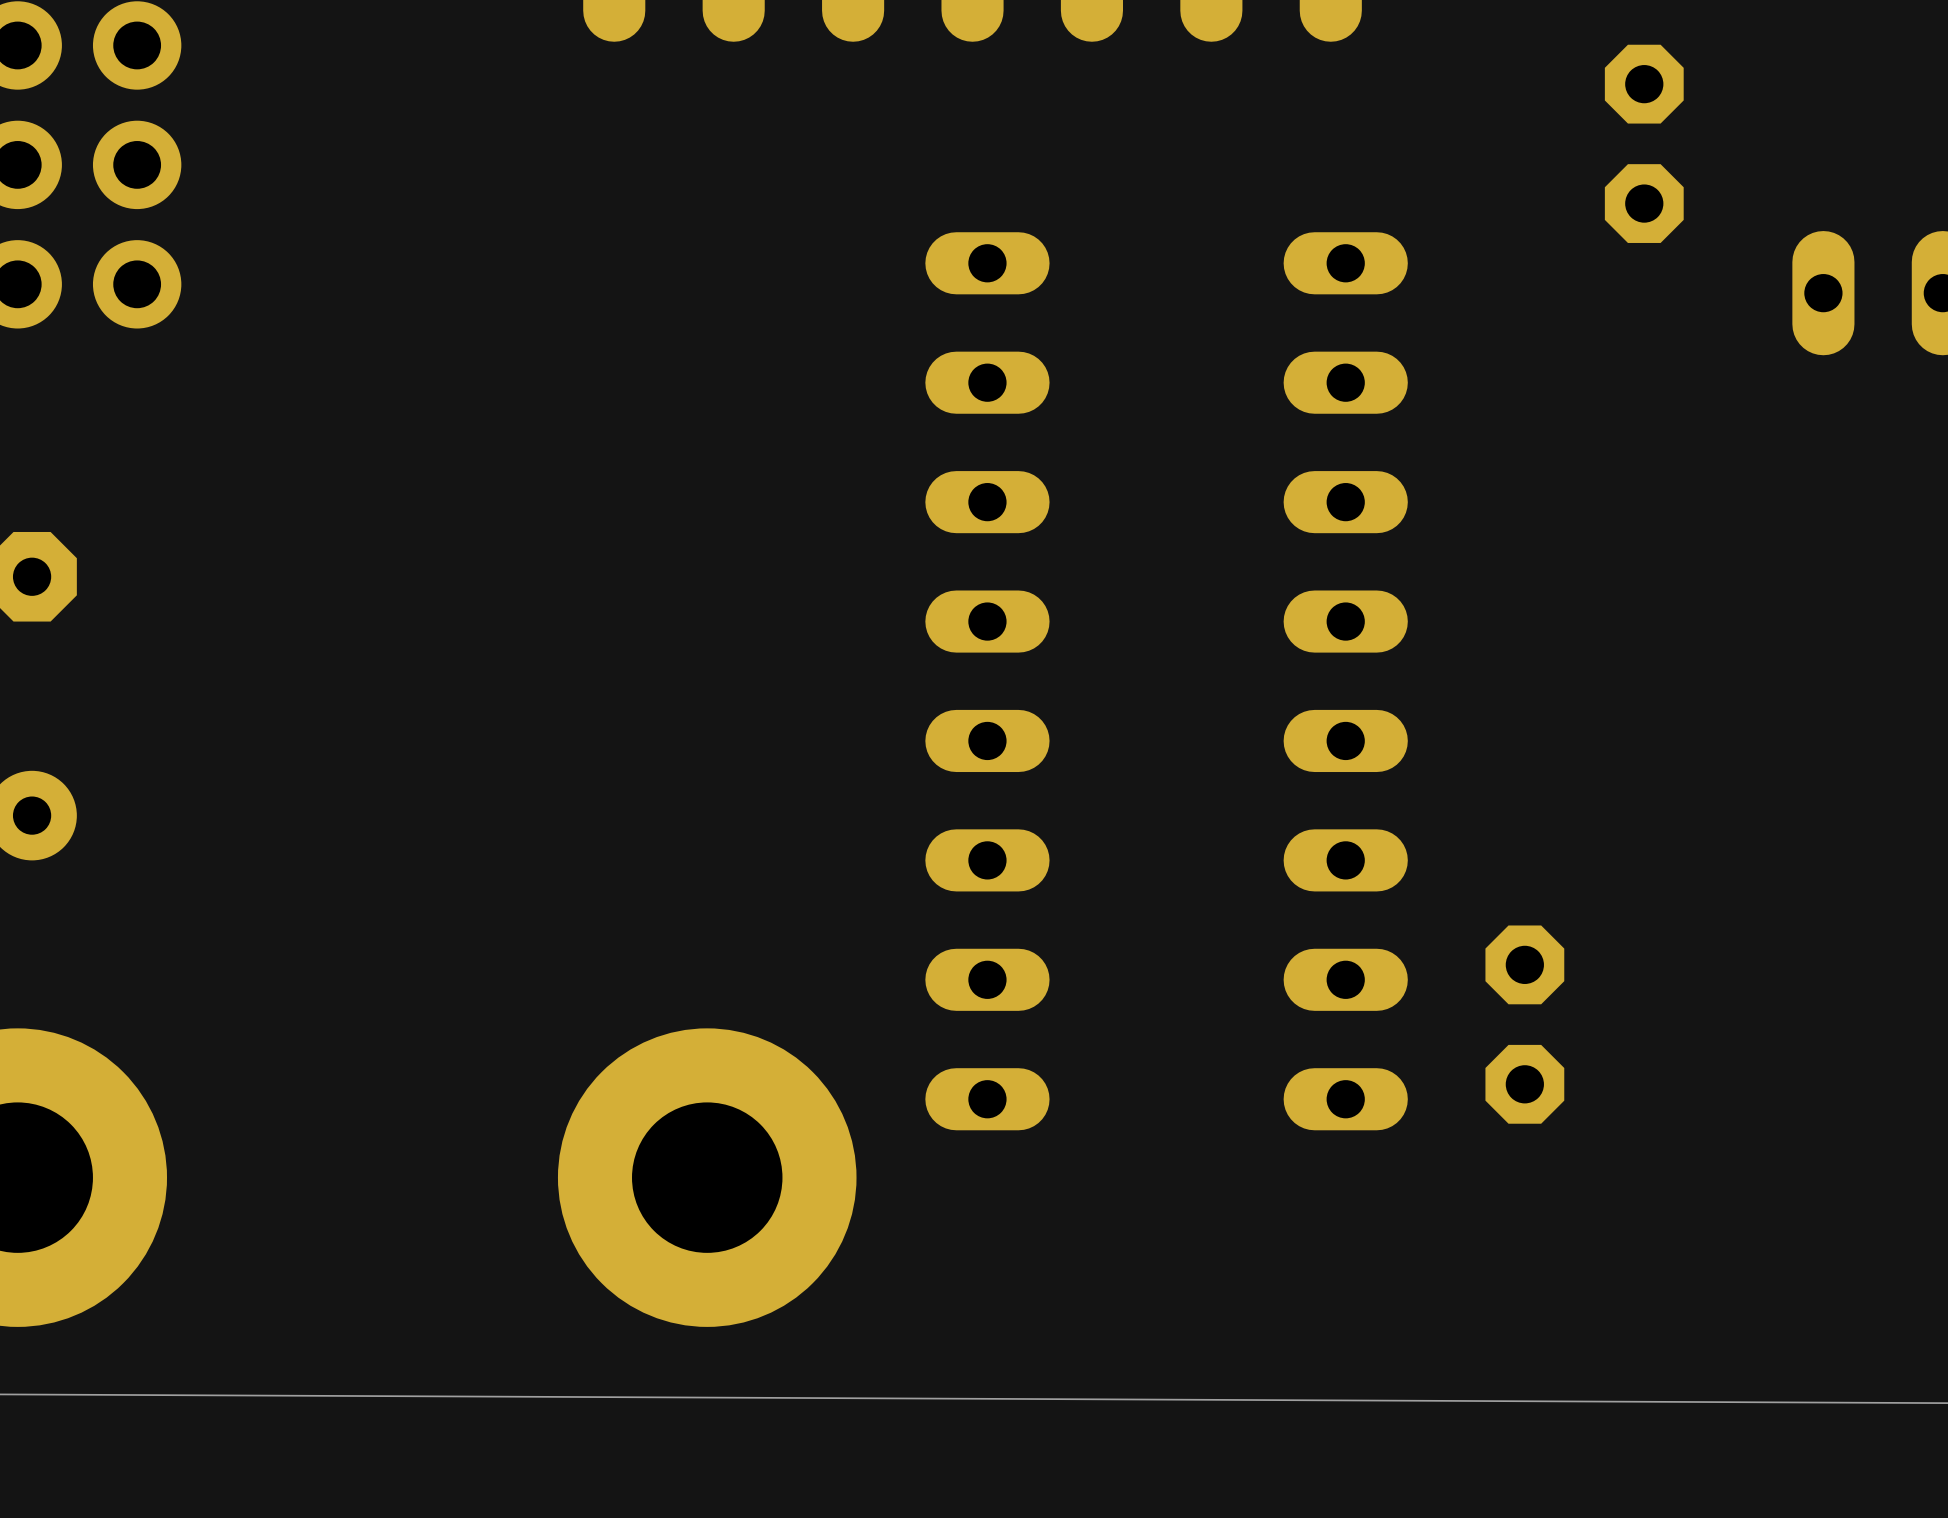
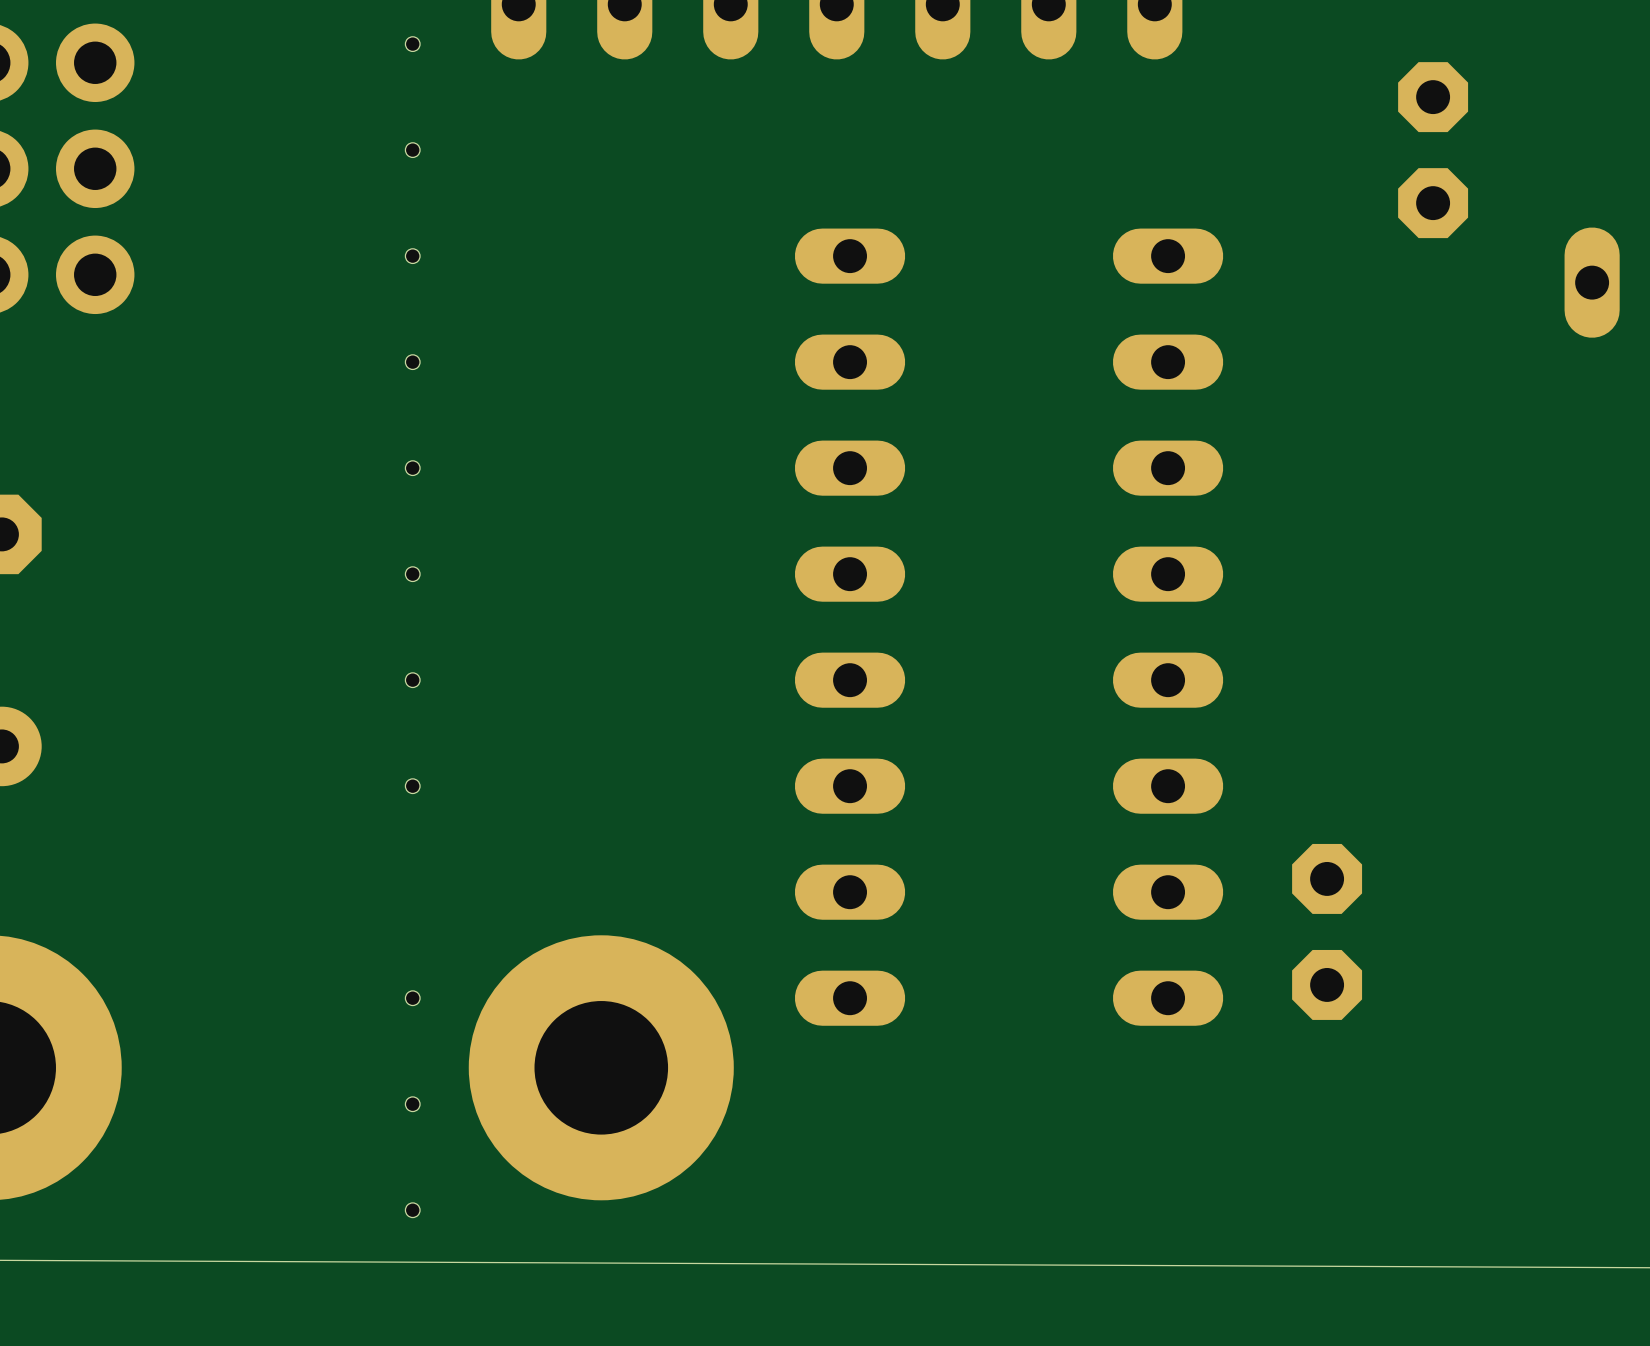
hole: none -> (412, 44)
hole: none -> (412, 150)
hole: none -> (412, 256)
hole: none -> (412, 362)
hole: none -> (412, 468)
hole: none -> (412, 574)
hole: none -> (412, 680)
hole: none -> (412, 786)
hole: none -> (412, 998)
hole: none -> (412, 1104)
hole: none -> (412, 1210)

